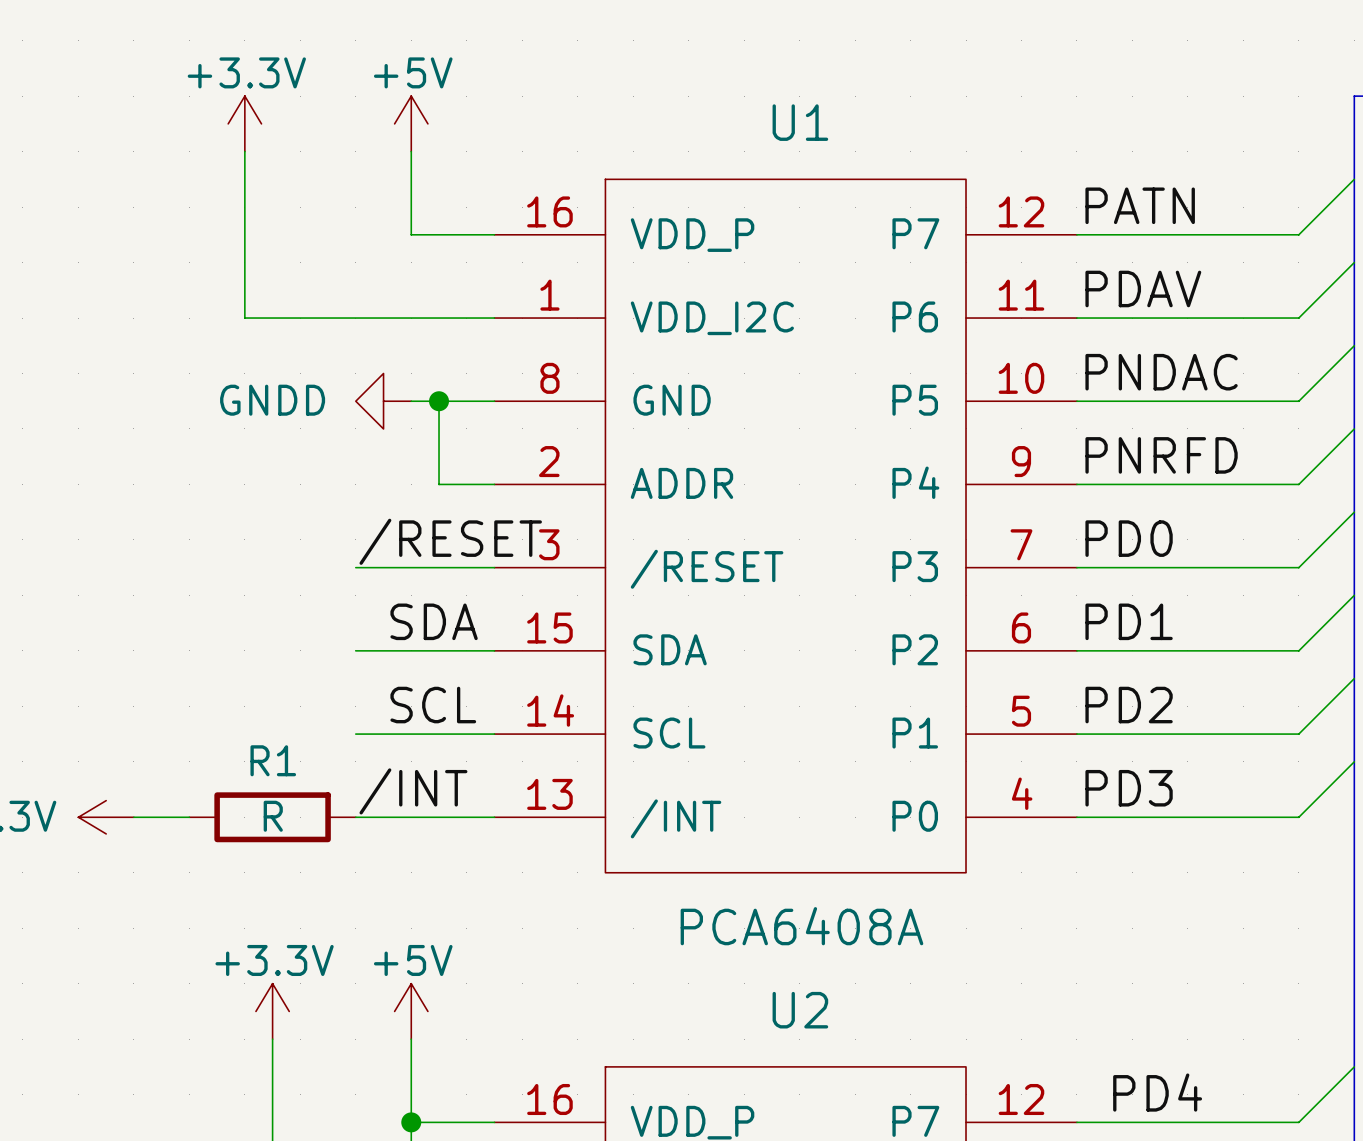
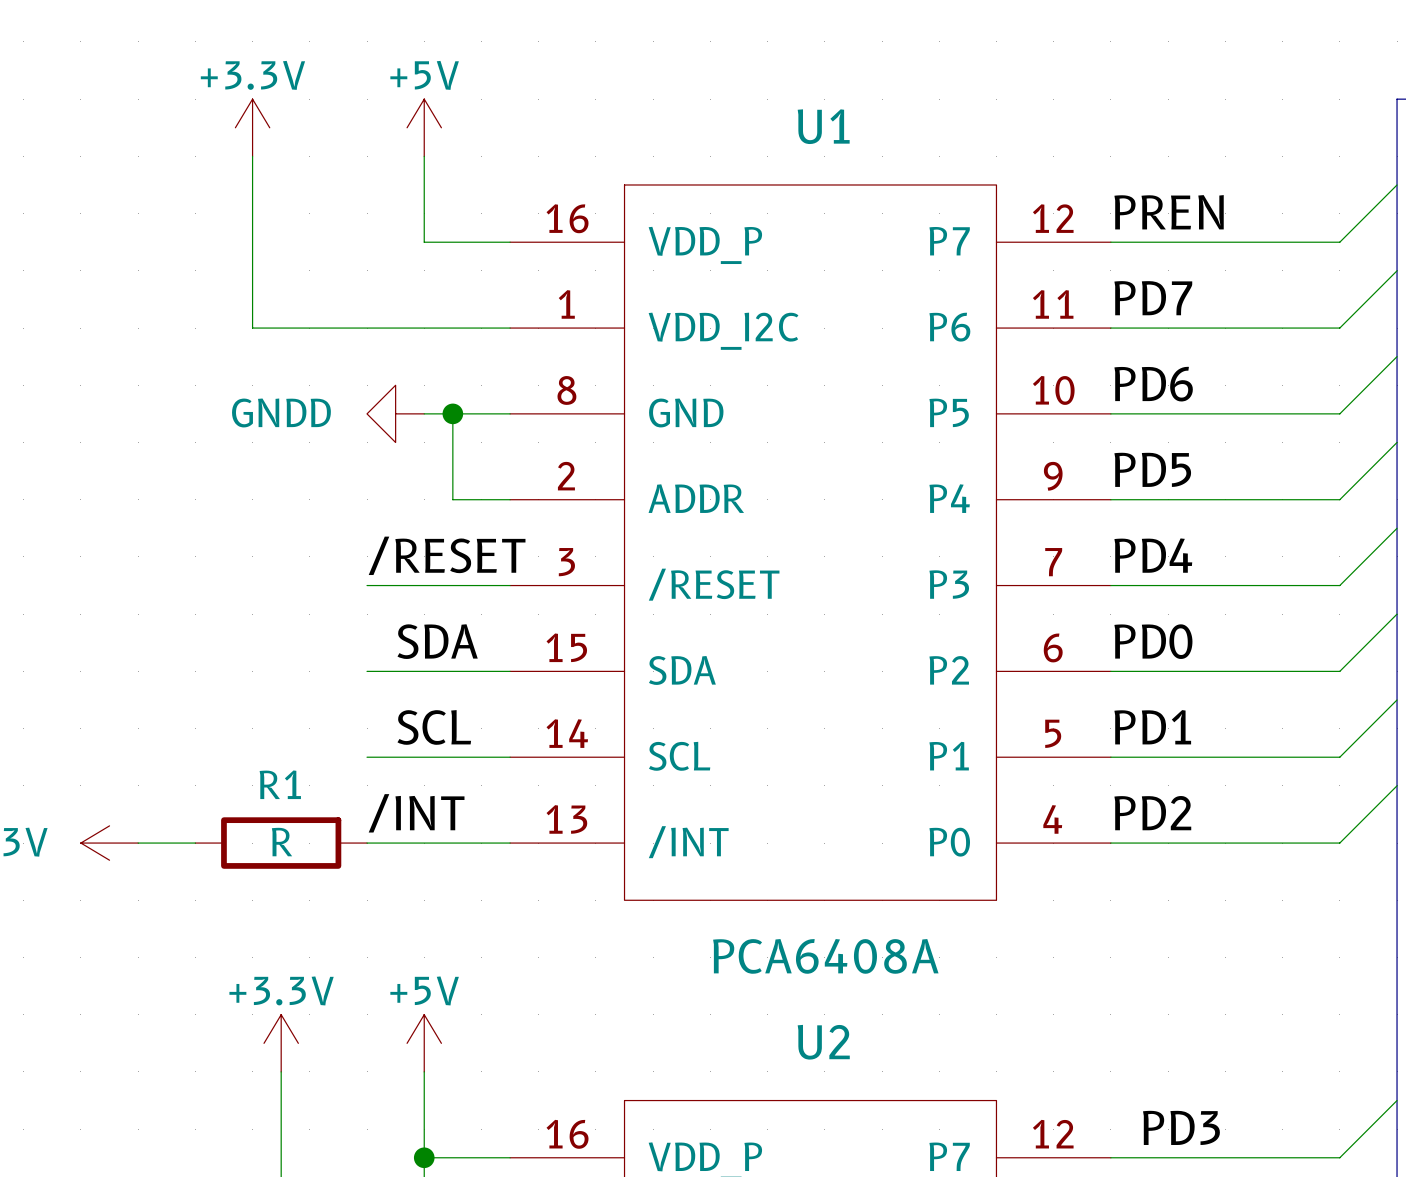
label: PATN (1140, 205) -> PREN (1169, 212)
label: PDAV (1143, 288) -> PD7 (1153, 298)
label: PNDAC (1161, 372) -> PD6 (1153, 384)
label: PNRFD (1161, 455) -> PD5 (1152, 469)
label: PD0 (1129, 538) -> PD4 (1153, 555)
label: PD1 (1129, 621) -> PD0 (1153, 641)
label: PD2 (1129, 705) -> PD1 (1152, 727)
label: PD3 (1129, 788) -> PD2 (1152, 813)
label: PD4 (1157, 1092) -> PD3 (1181, 1127)

